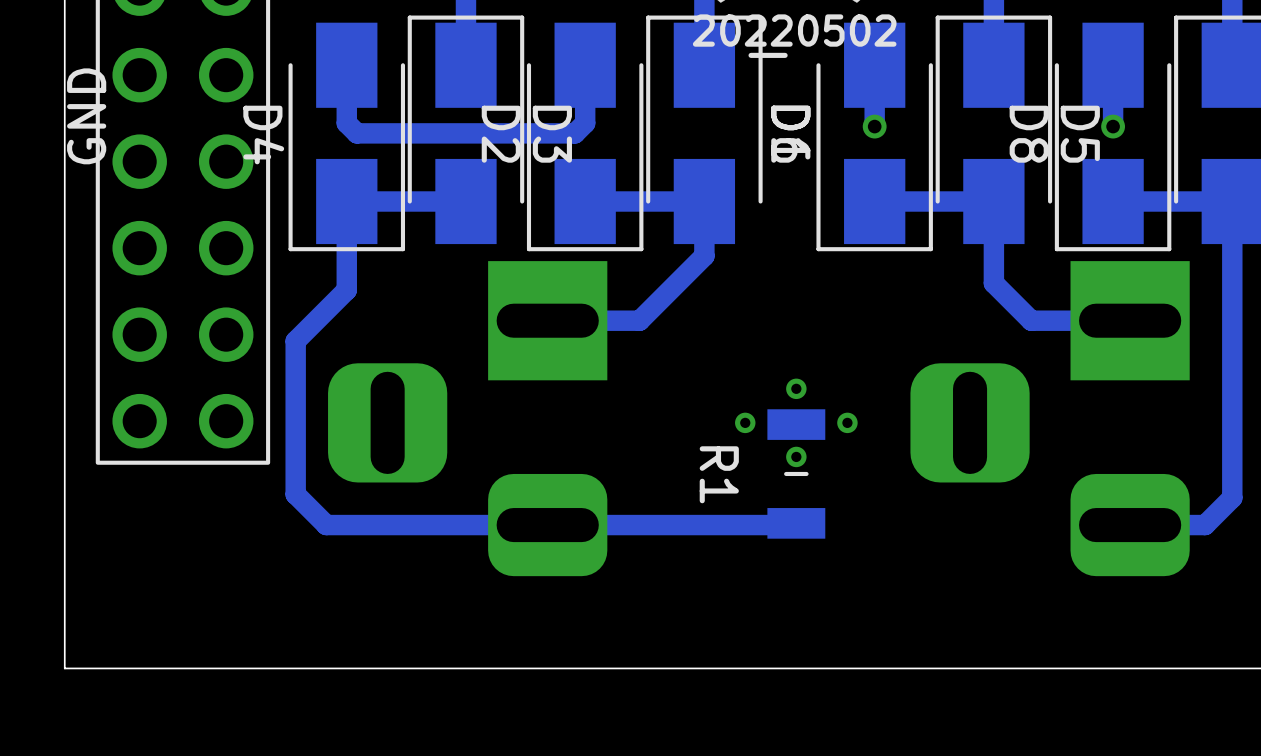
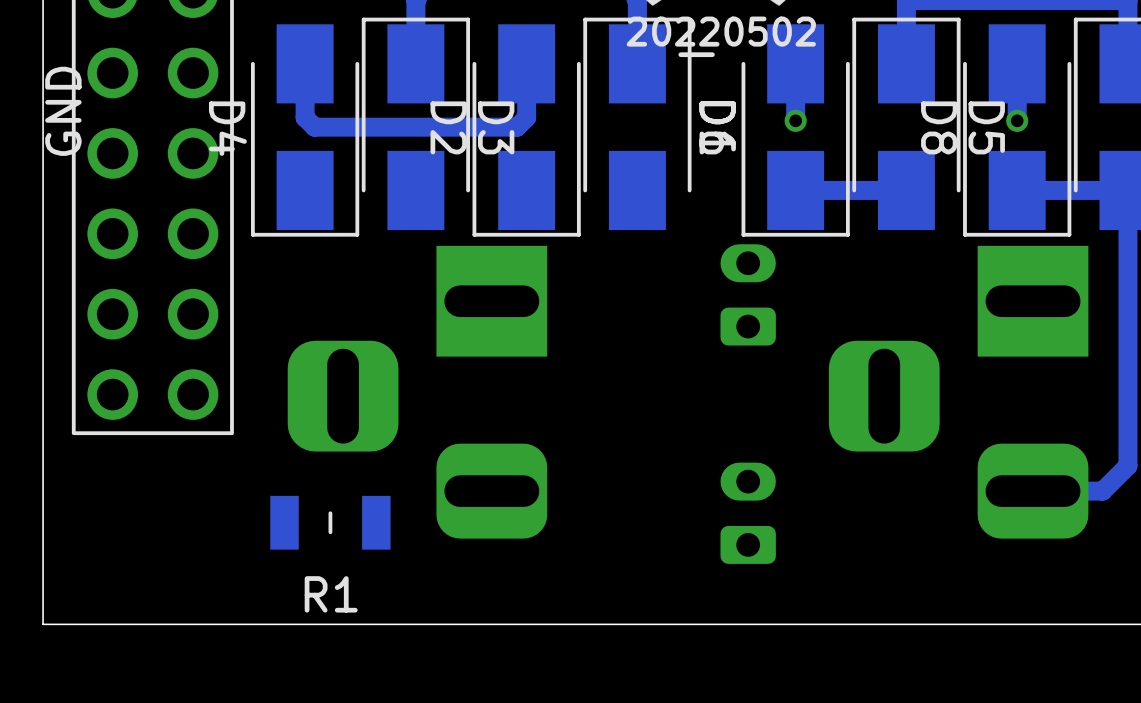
track: (465, 201) (346, 201) (346, 290) (295, 341) (295, 494) (326, 525) (794, 525) (796, 523) -> none
track: (585, 201) (704, 201) (704, 255) (639, 320) (547, 320) -> none
track: (993, 201) (993, 283) (1031, 320) (1130, 320) -> none
part: none -> (748, 294)
via: (796, 388) -> none
via: (745, 422) -> none
via: (847, 422) -> none
via: (796, 456) -> none
R1 rotation: 0° (796, 473) -> 90° clockwise (330, 522)
R1 position: (796, 473) -> (330, 522)
R1 name position: R1 (719, 474) -> R1 (331, 594)
part: none -> (748, 513)

